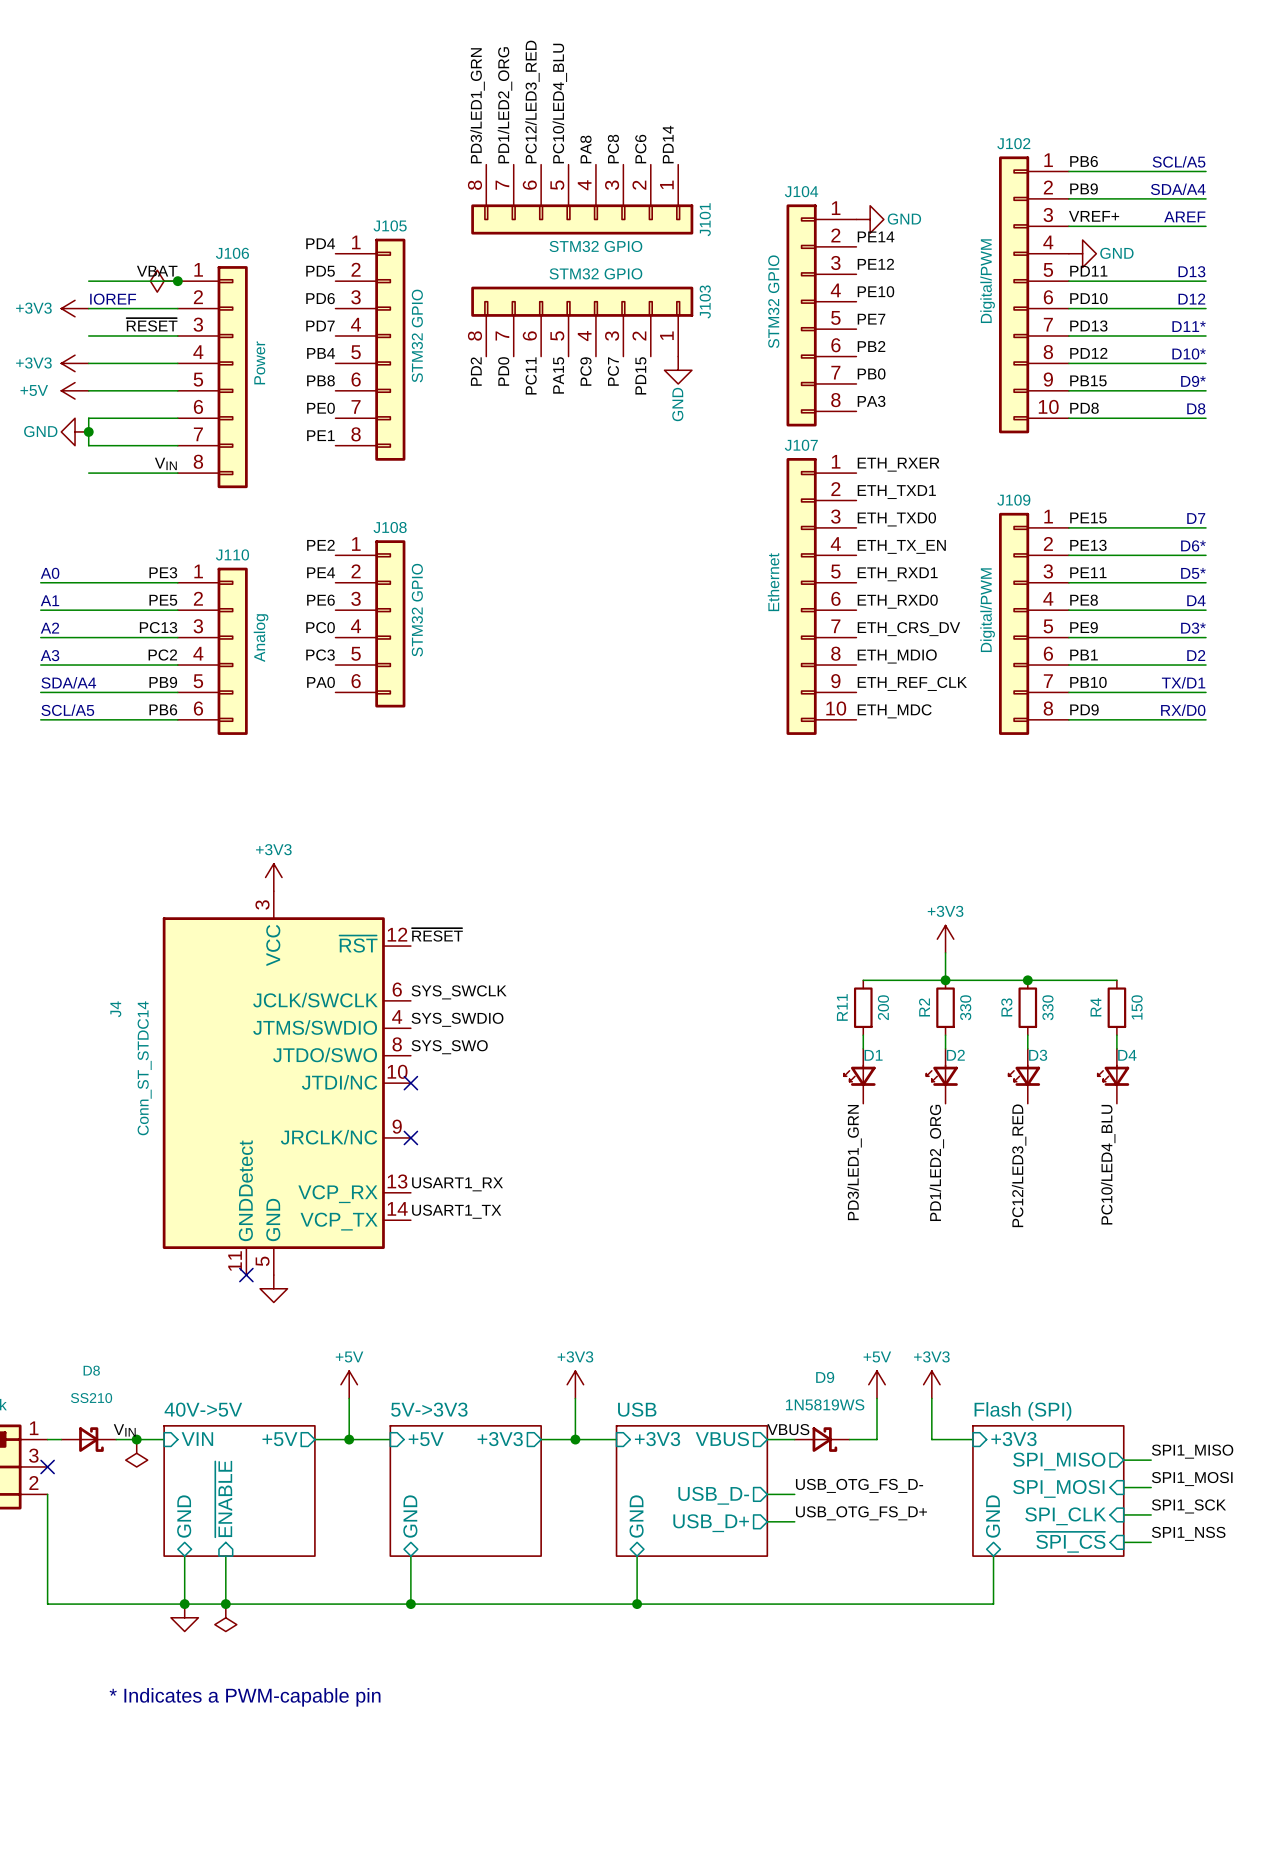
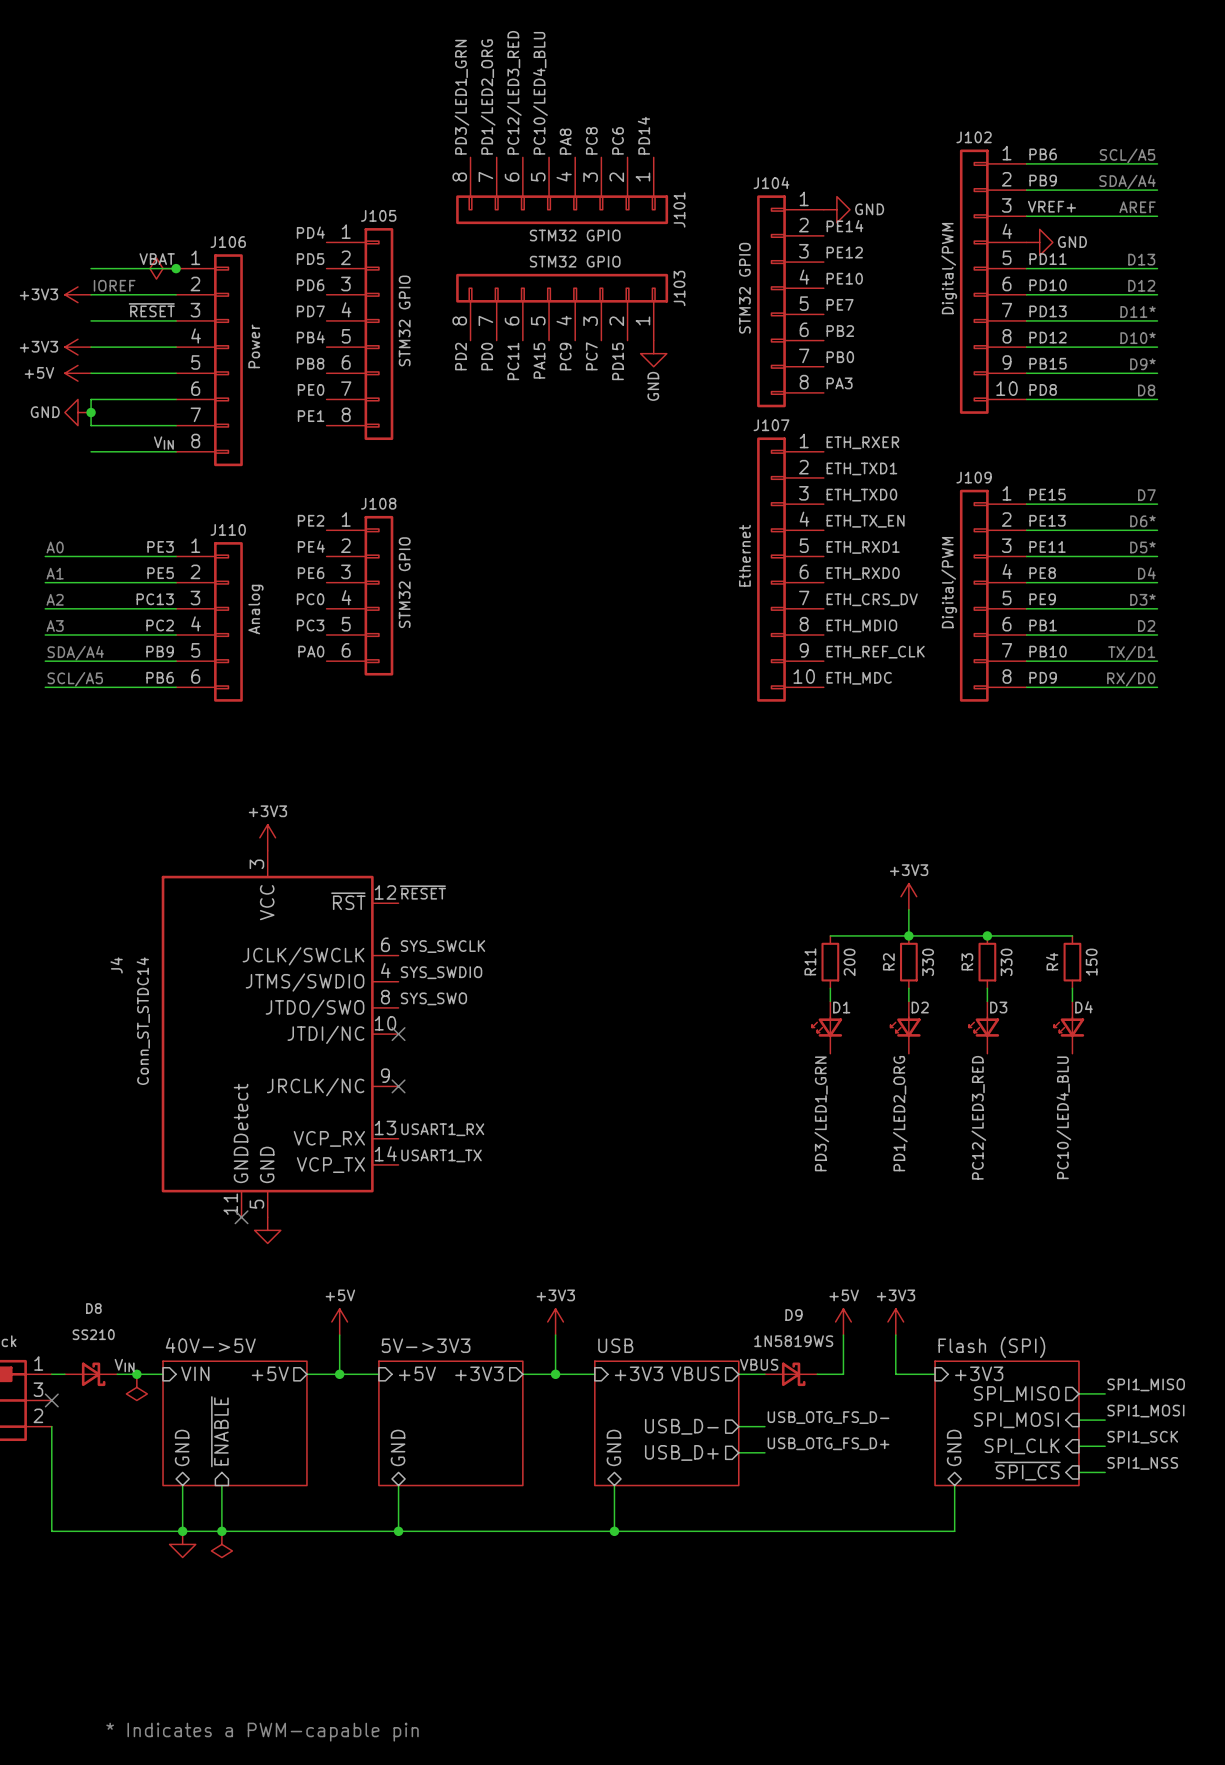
text position: * Indicates a PWM-capable pin (245, 1697) -> * Indicates a PWM-capable pin (262, 1732)

